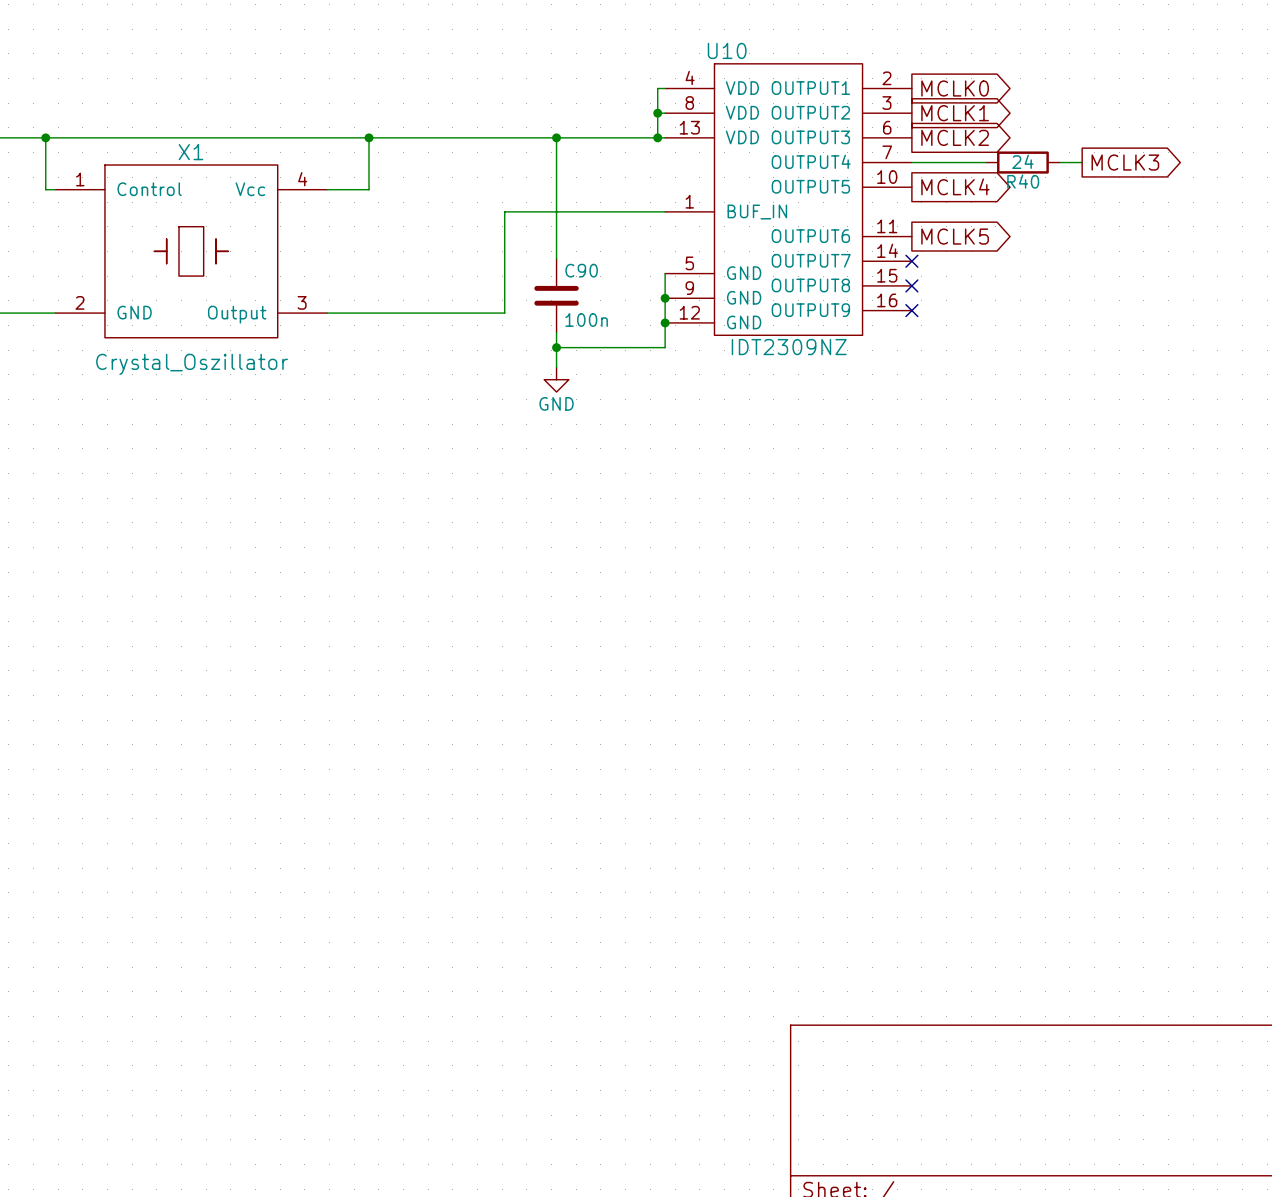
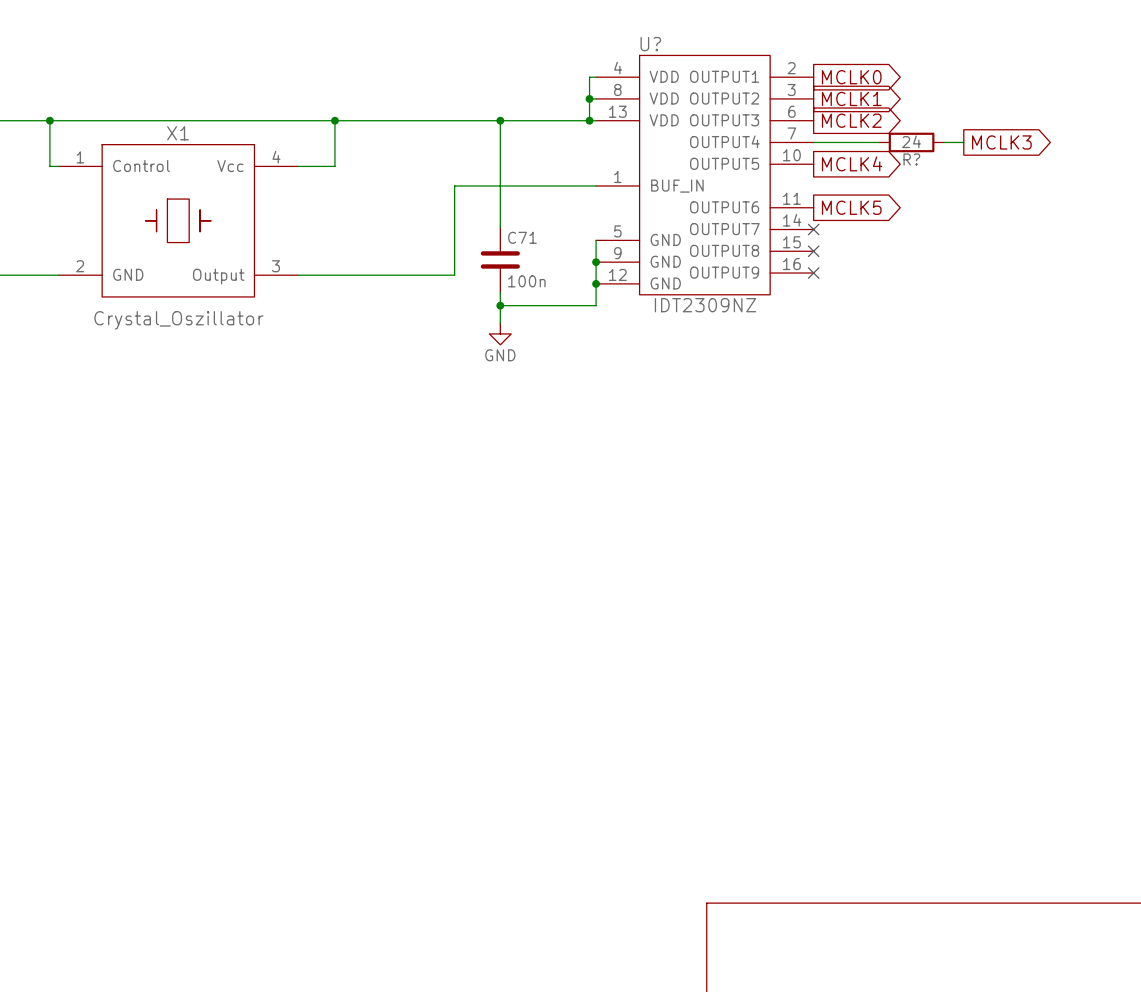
U10 name: U10 (727, 50) -> U? (650, 44)
R40 name: R40 (1023, 181) -> R? (911, 159)
C90 name: C90 (581, 270) -> C71 (522, 237)

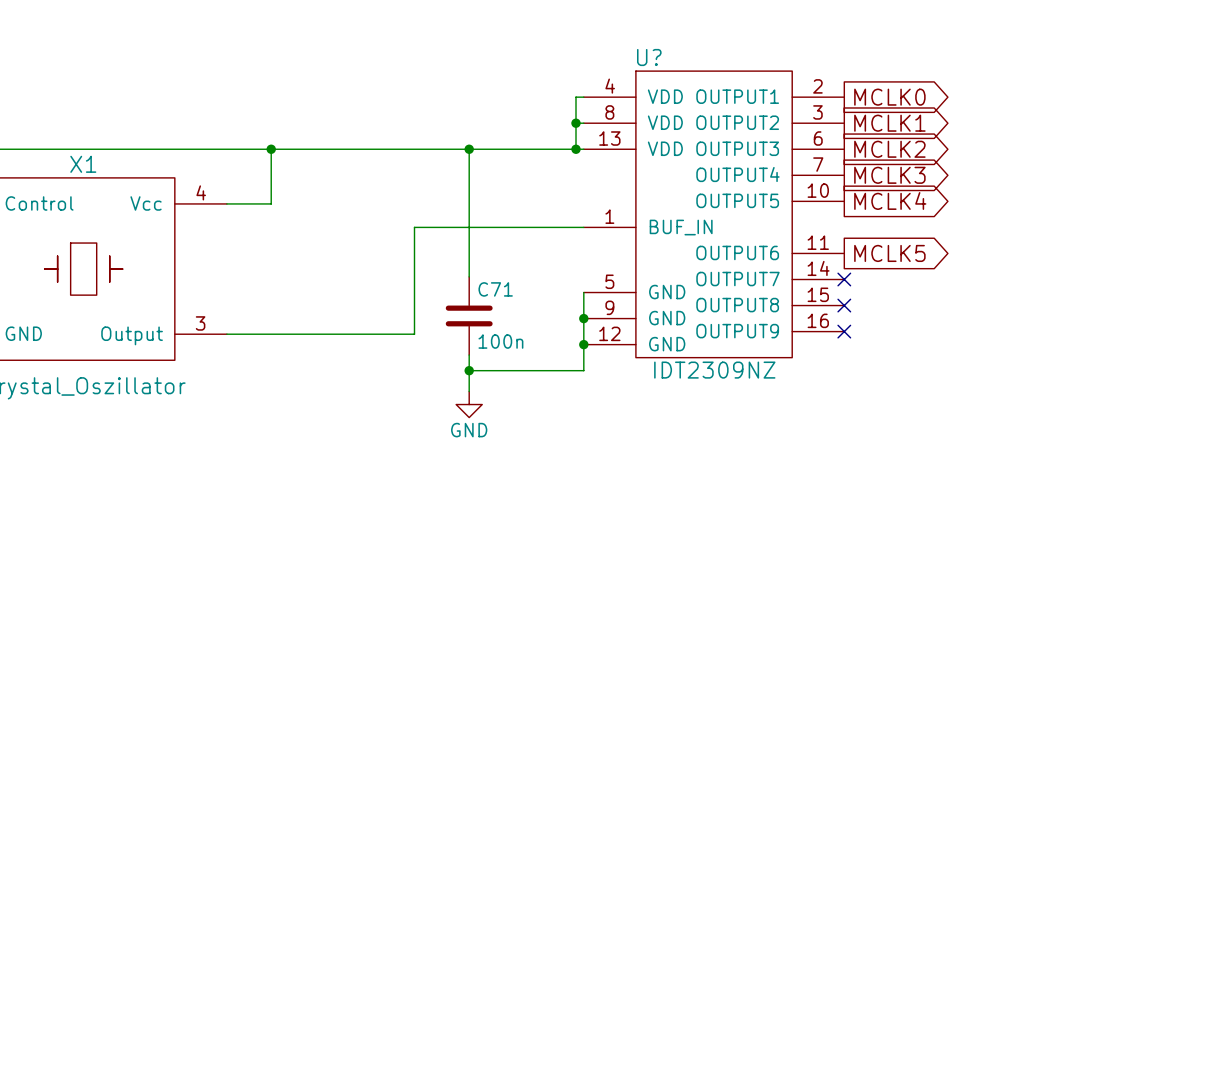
wire: (813, 142) (878, 142) -> none
R?: 24 (911, 142) -> none
wire: (944, 142) (963, 142) -> none
global label position: MCLK3 (1001, 142) -> MCLK3 (889, 175)

